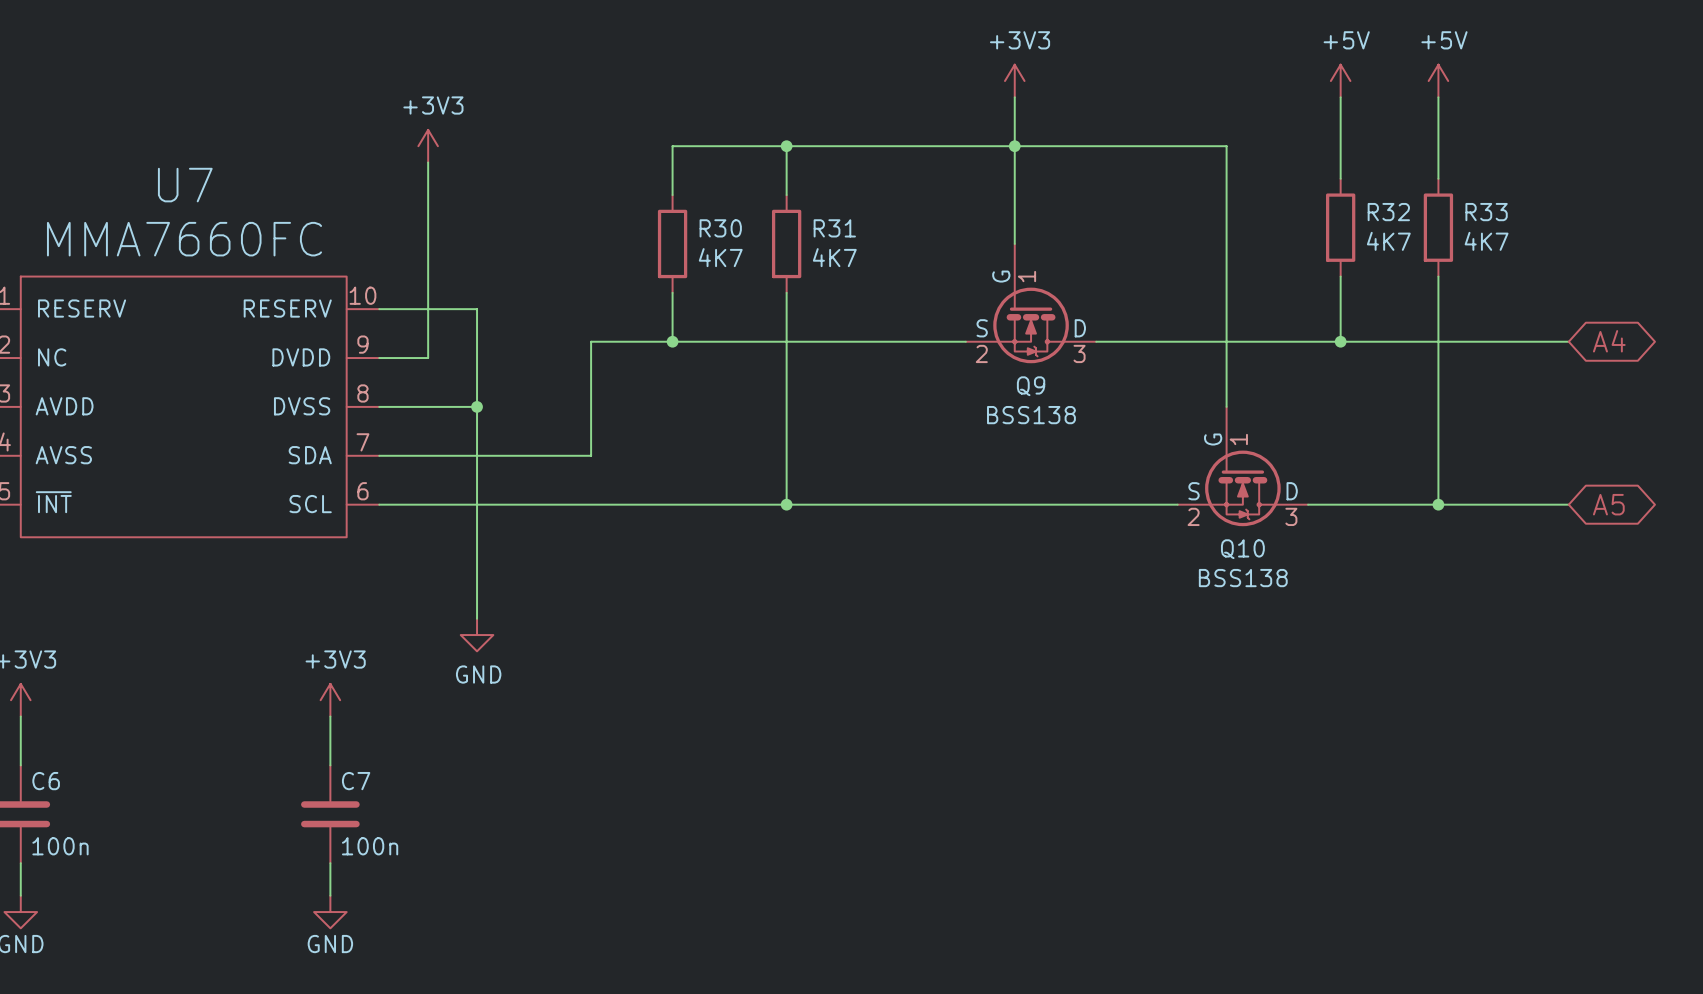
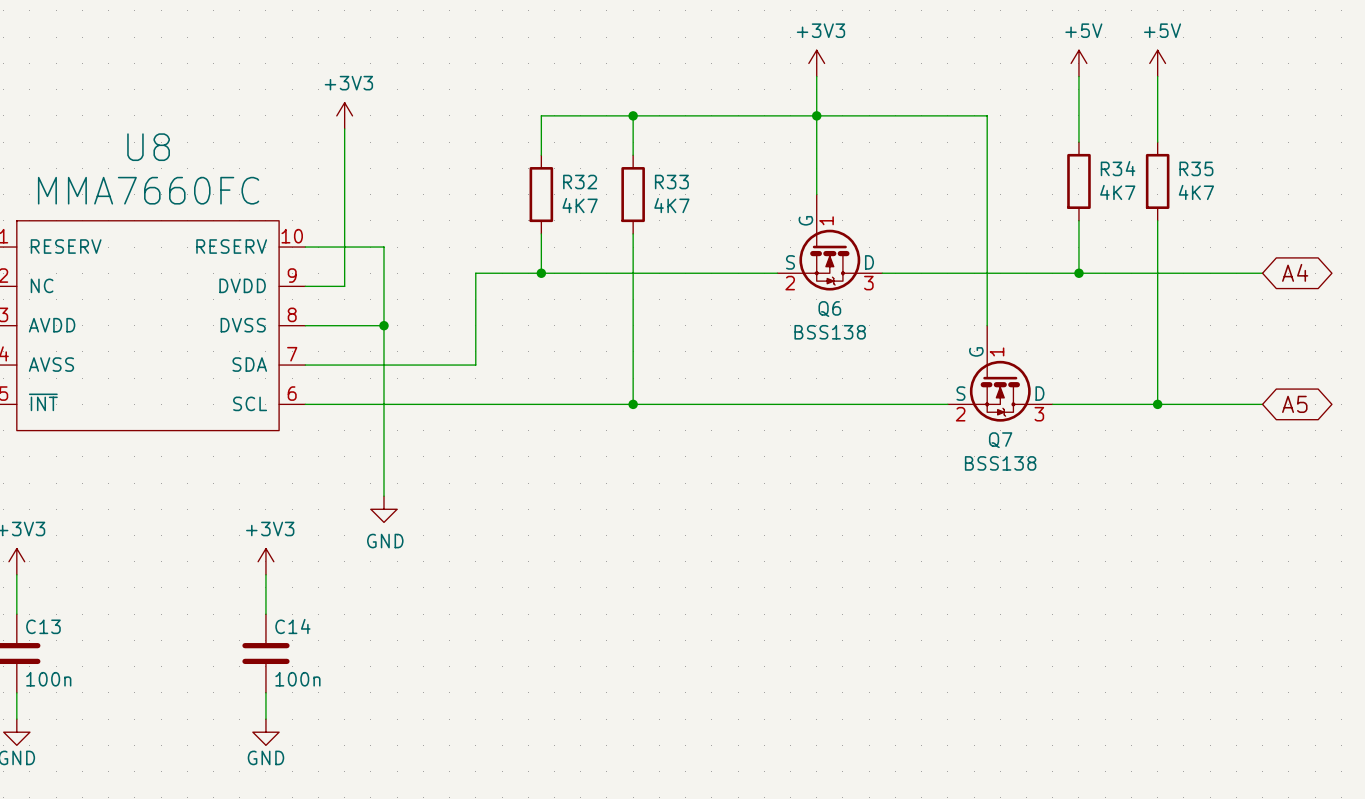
U7 name: U7 (185, 185) -> U8 (148, 147)
R32 name: R32 (1388, 212) -> R34 (1118, 168)
R33 name: R33 (1486, 212) -> R35 (1196, 168)
R30 name: R30 (720, 228) -> R32 (580, 182)
R31 name: R31 (834, 228) -> R33 (671, 182)
Q9 name: Q9 (1031, 386) -> Q6 (829, 309)
Q10 name: Q10 (1242, 549) -> Q7 (1000, 440)
C6 name: C6 (46, 781) -> C13 (43, 626)
C7 name: C7 (356, 781) -> C14 (292, 626)

